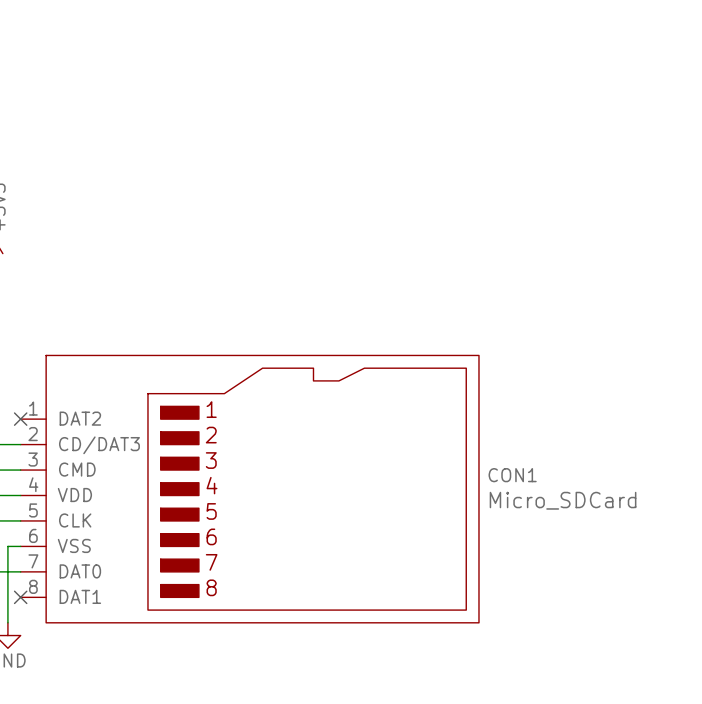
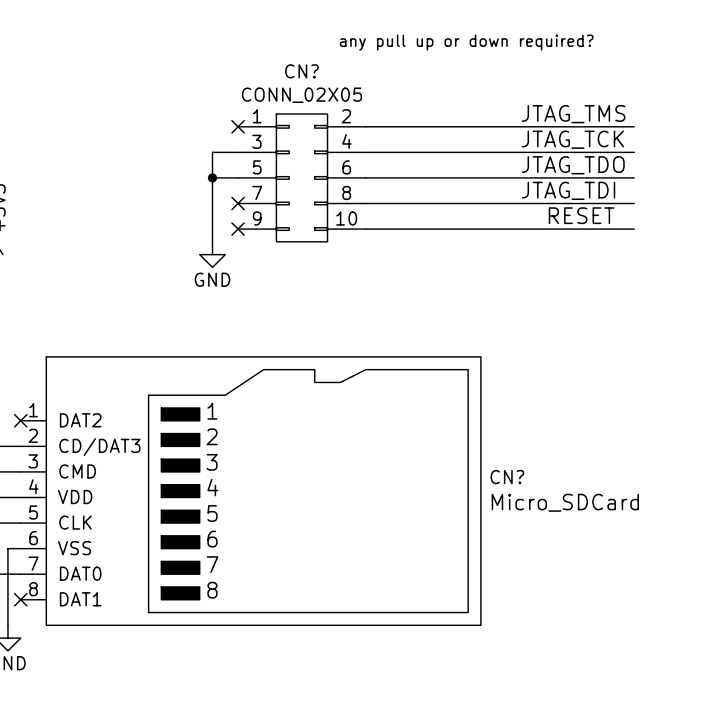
text: none -> any pull up or down required? (466, 42)
label: none -> JTAG_TMS (573, 114)
no-connect mark: none -> (238, 126)
wire: none -> (365, 126) (634, 126)
label: none -> JTAG_TCK (572, 139)
wire: none -> (238, 152) (212, 152) (212, 241)
wire: none -> (365, 152) (634, 152)
label: none -> JTAG_TDO (573, 165)
wire: none -> (212, 177) (238, 177)
junction: none -> (212, 177)
CN?: none -> CONN_02X05 (301, 177)
wire: none -> (365, 177) (634, 177)
label: none -> JTAG_TDI (568, 190)
no-connect mark: none -> (238, 203)
wire: none -> (365, 203) (634, 203)
label: none -> RESET (581, 215)
no-connect mark: none -> (238, 229)
wire: none -> (365, 229) (634, 229)
power symbol: none -> GND (212, 254)
CON1 name: CON1 (512, 475) -> CN? (507, 477)

